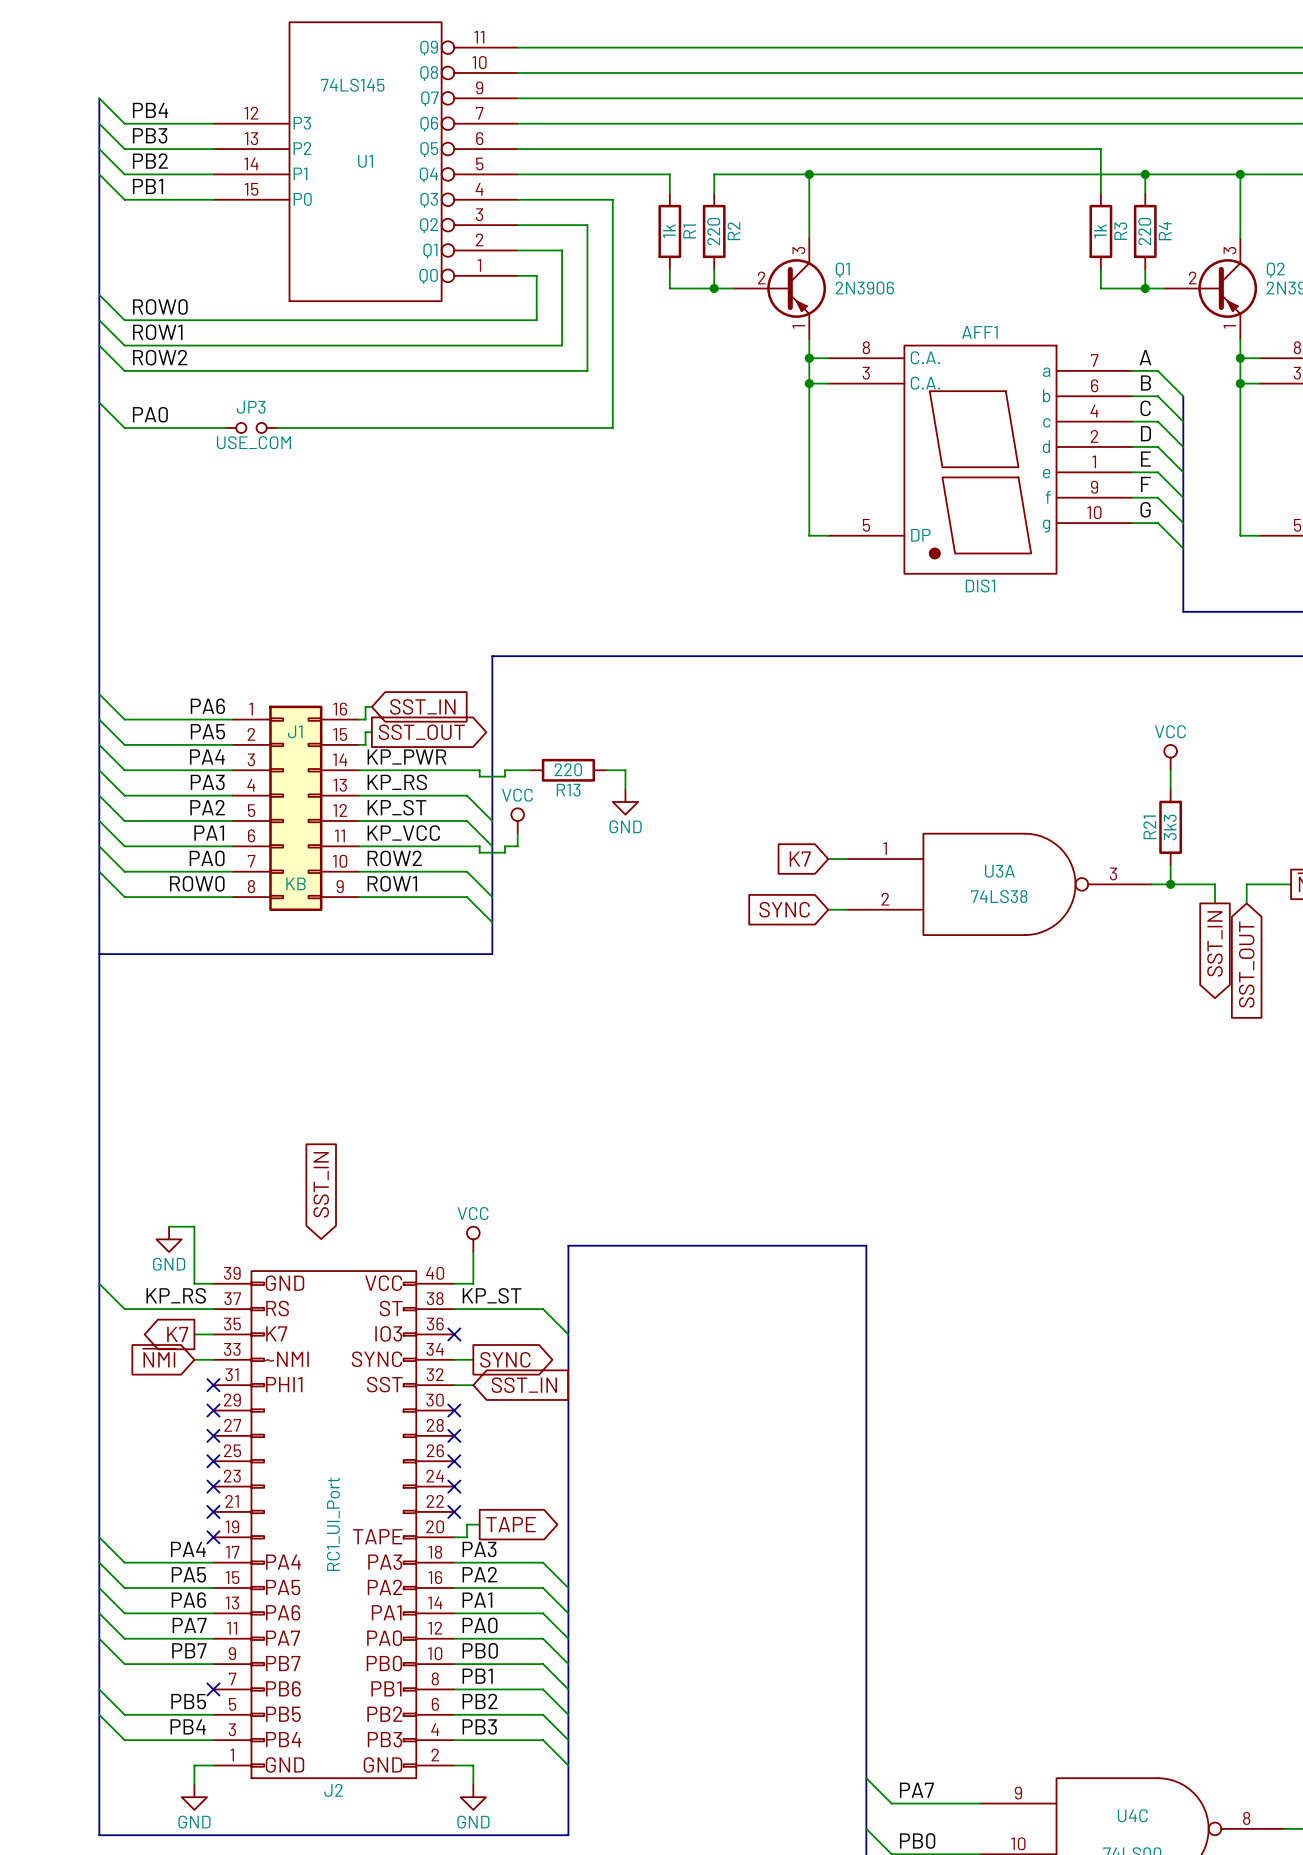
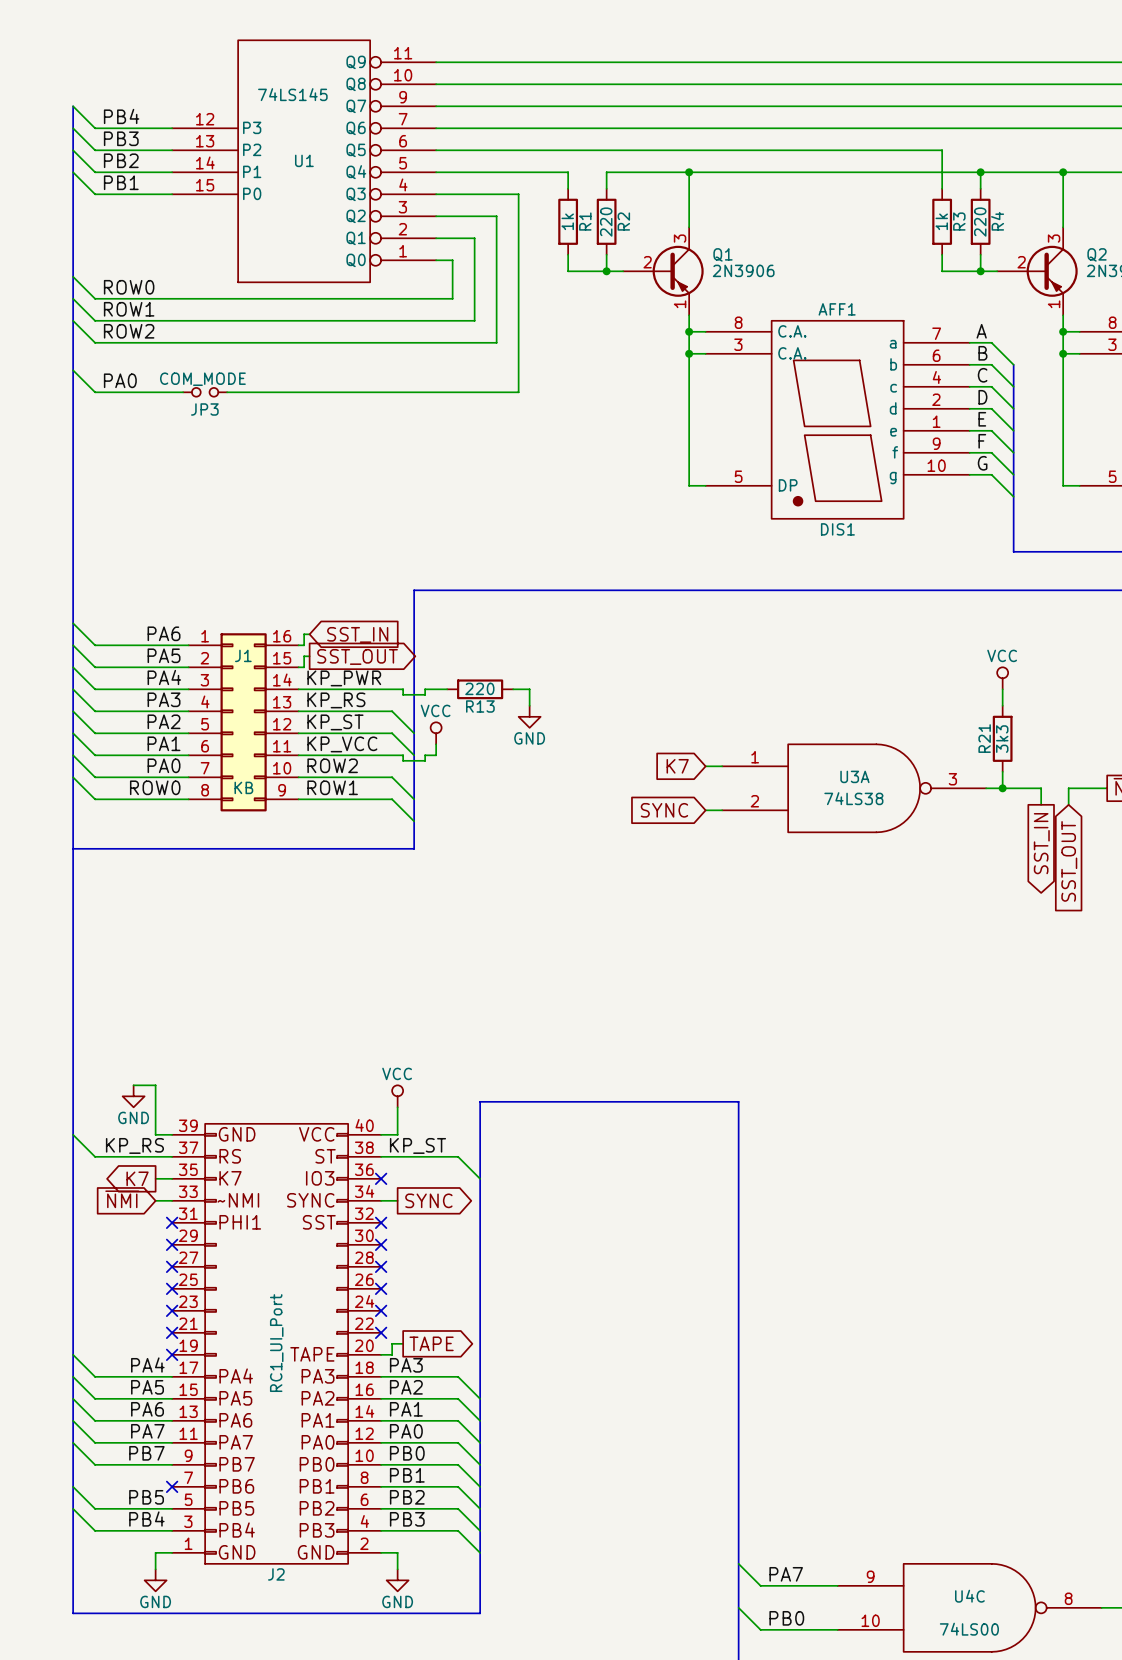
JP3 name position: JP3 (251, 407) -> JP3 (204, 409)
JP3 value: USE_COM (253, 442) -> COM_MODE (202, 379)
global label: SST_IN (321, 1184) -> none
wire: (454, 1385) (473, 1385) -> none
no-connect mark: none -> (381, 1222)
global label: SST_IN (524, 1385) -> none

